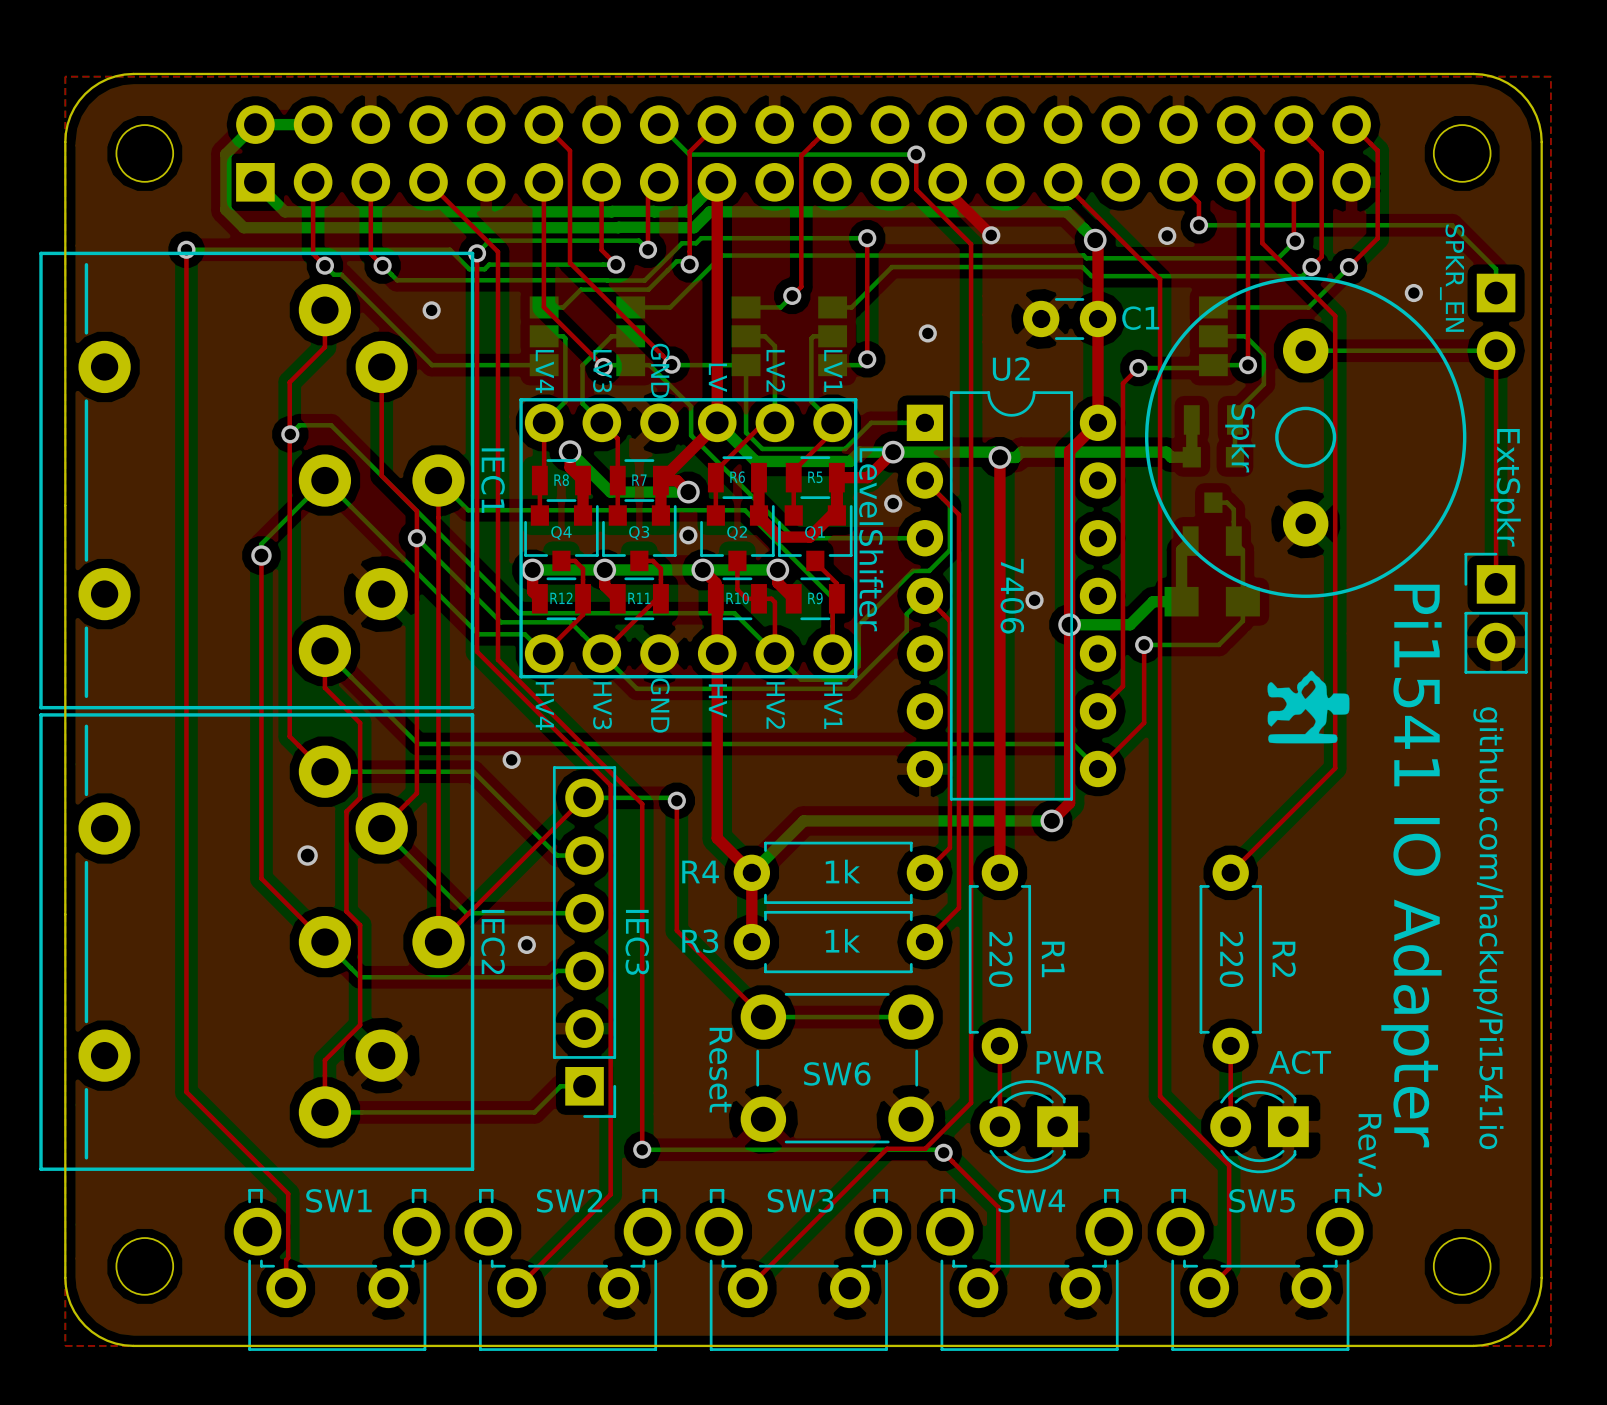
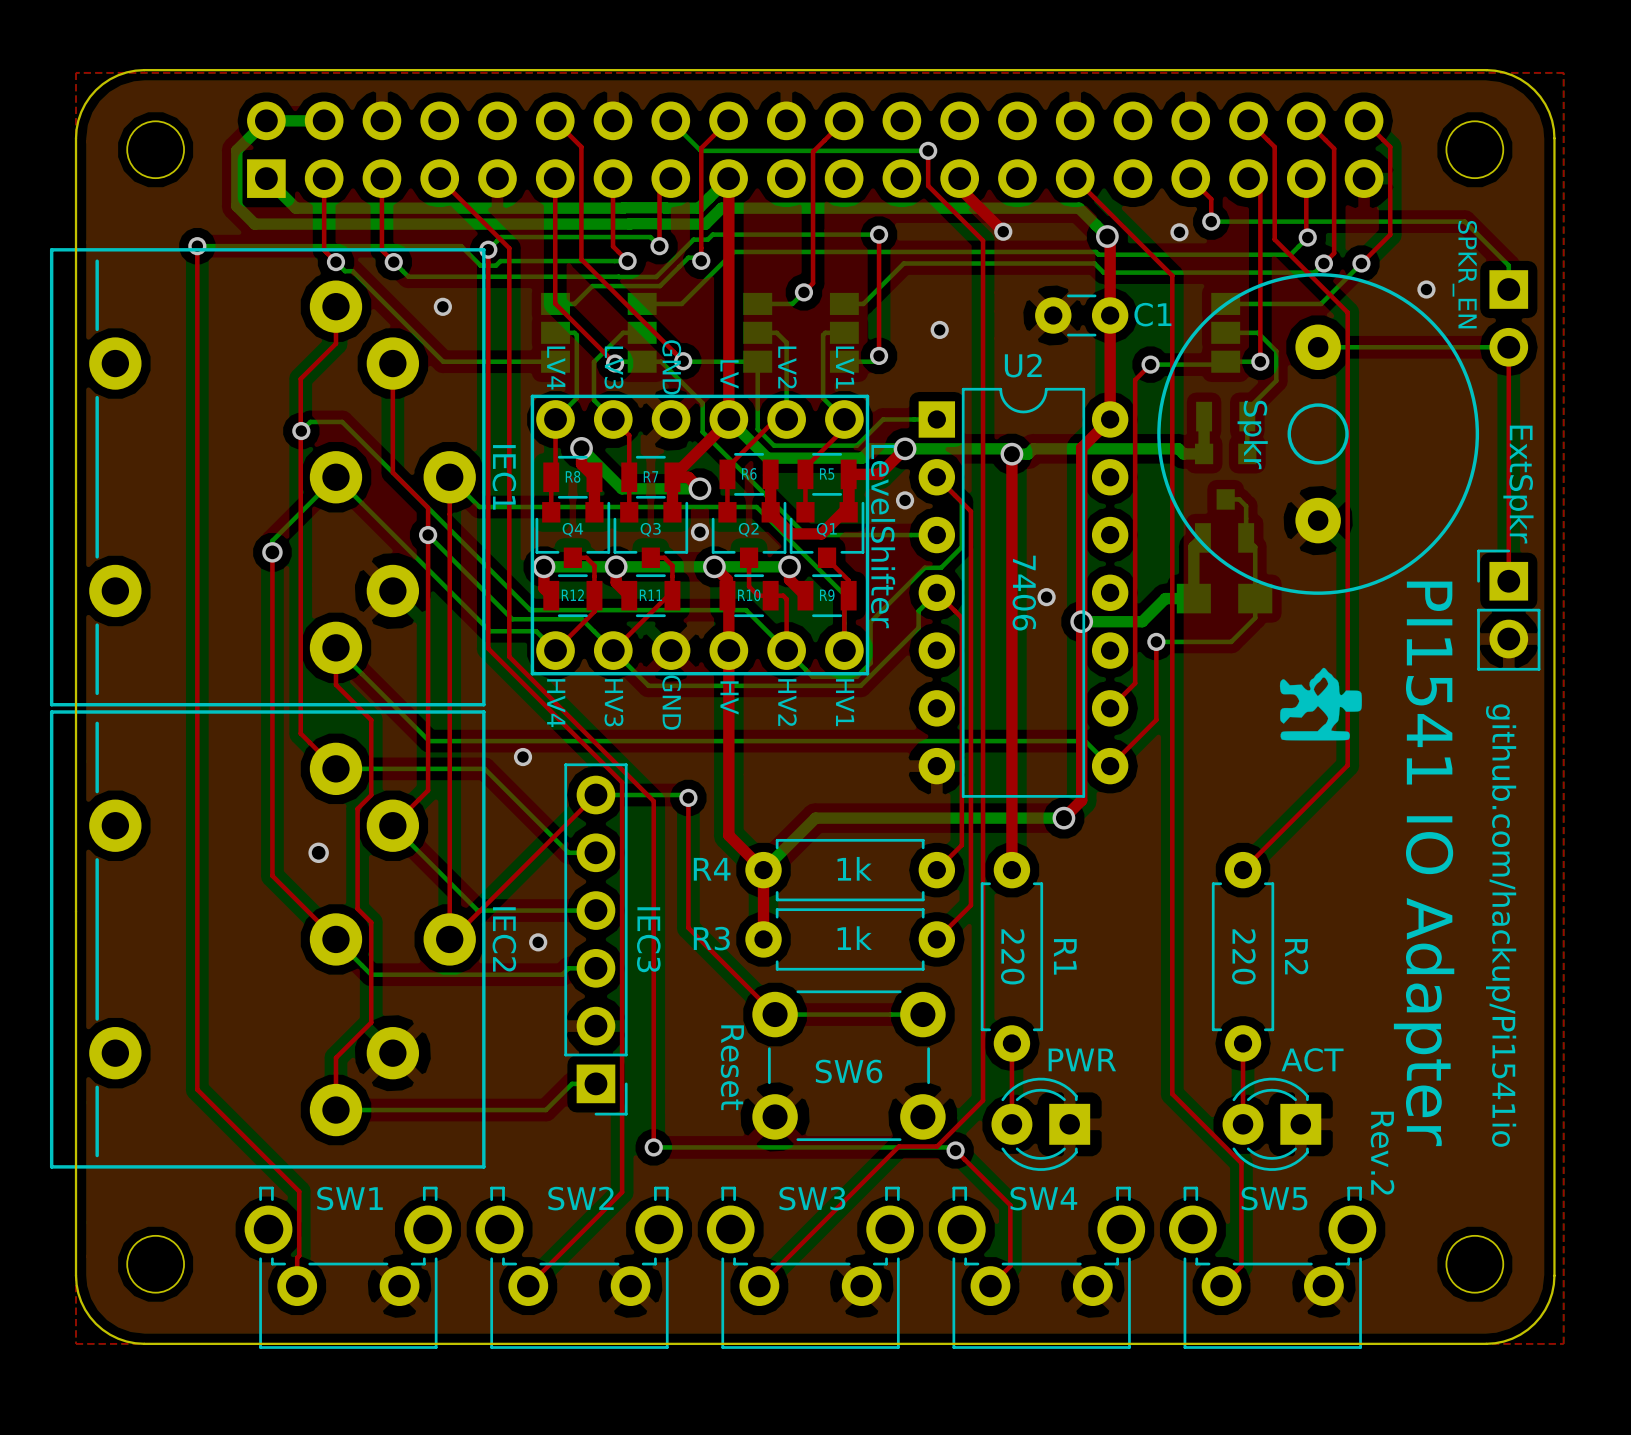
text: Pi1541 IO Adapter (1411, 866) -> PI1541 IO Adapter (1424, 863)

